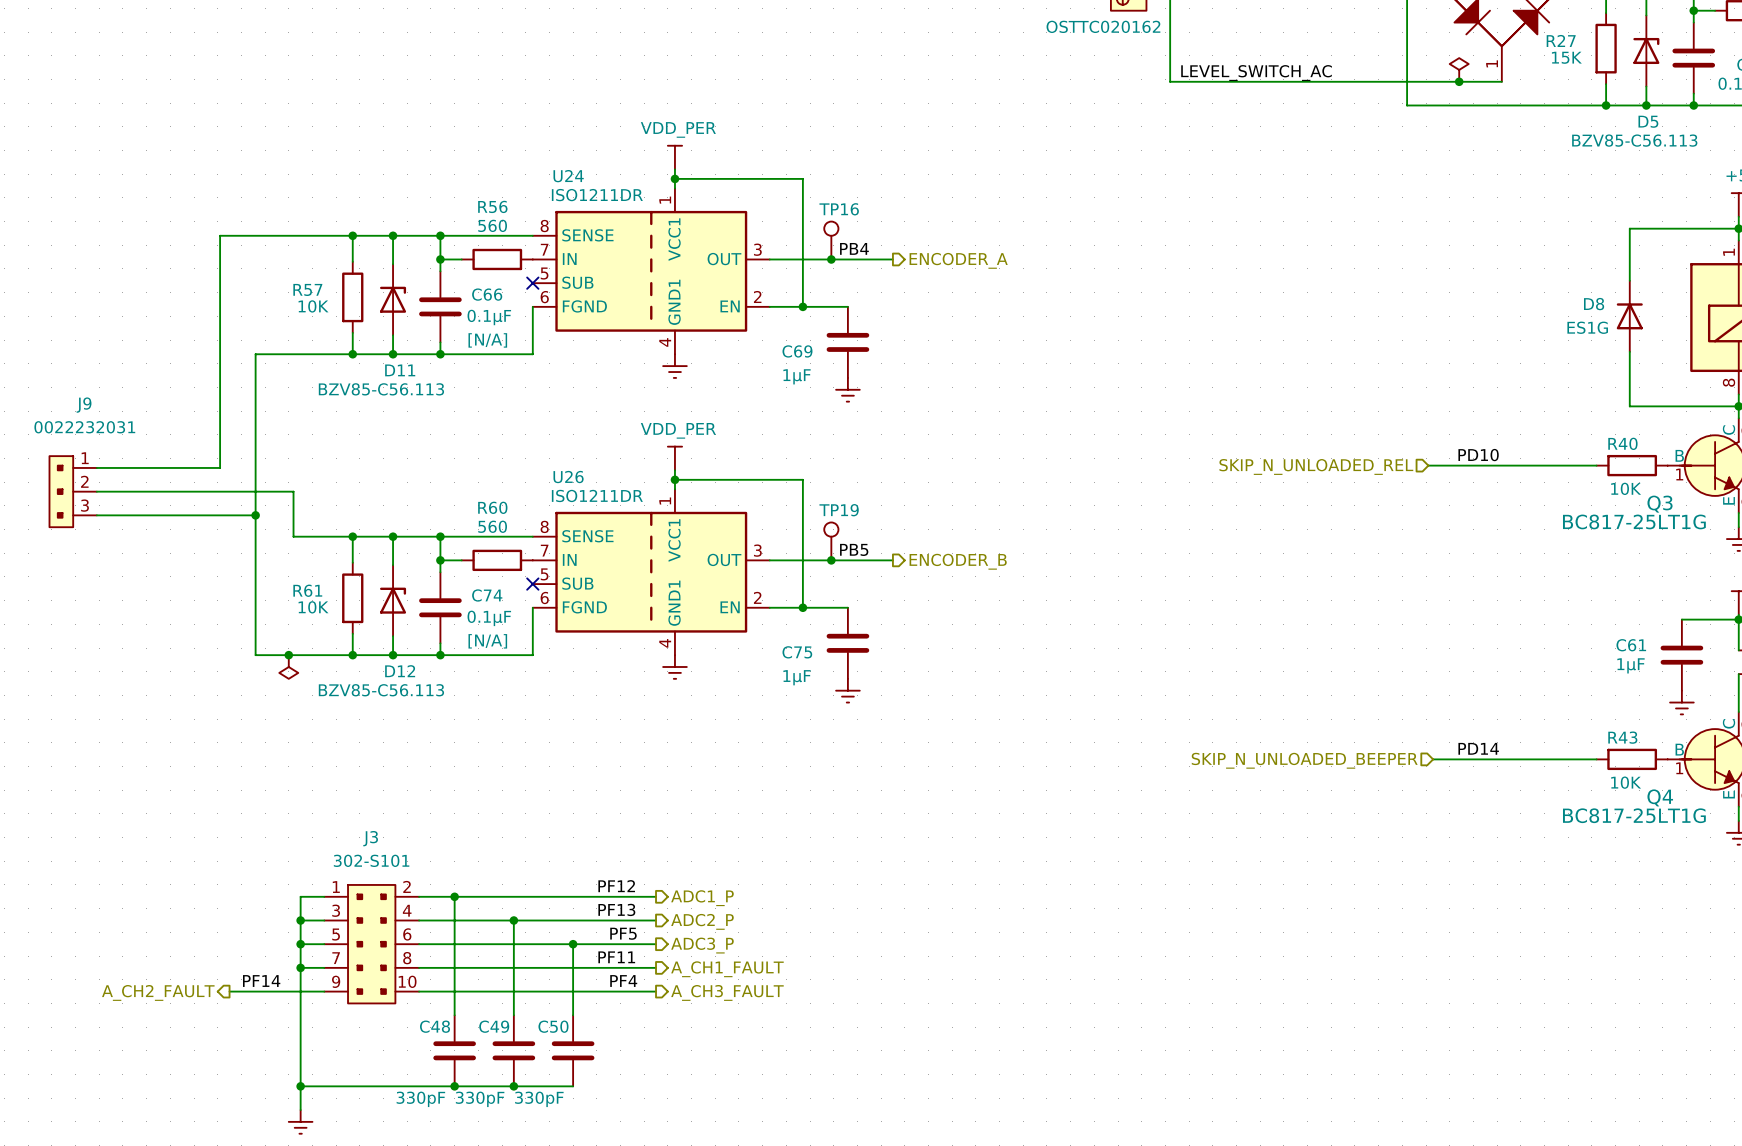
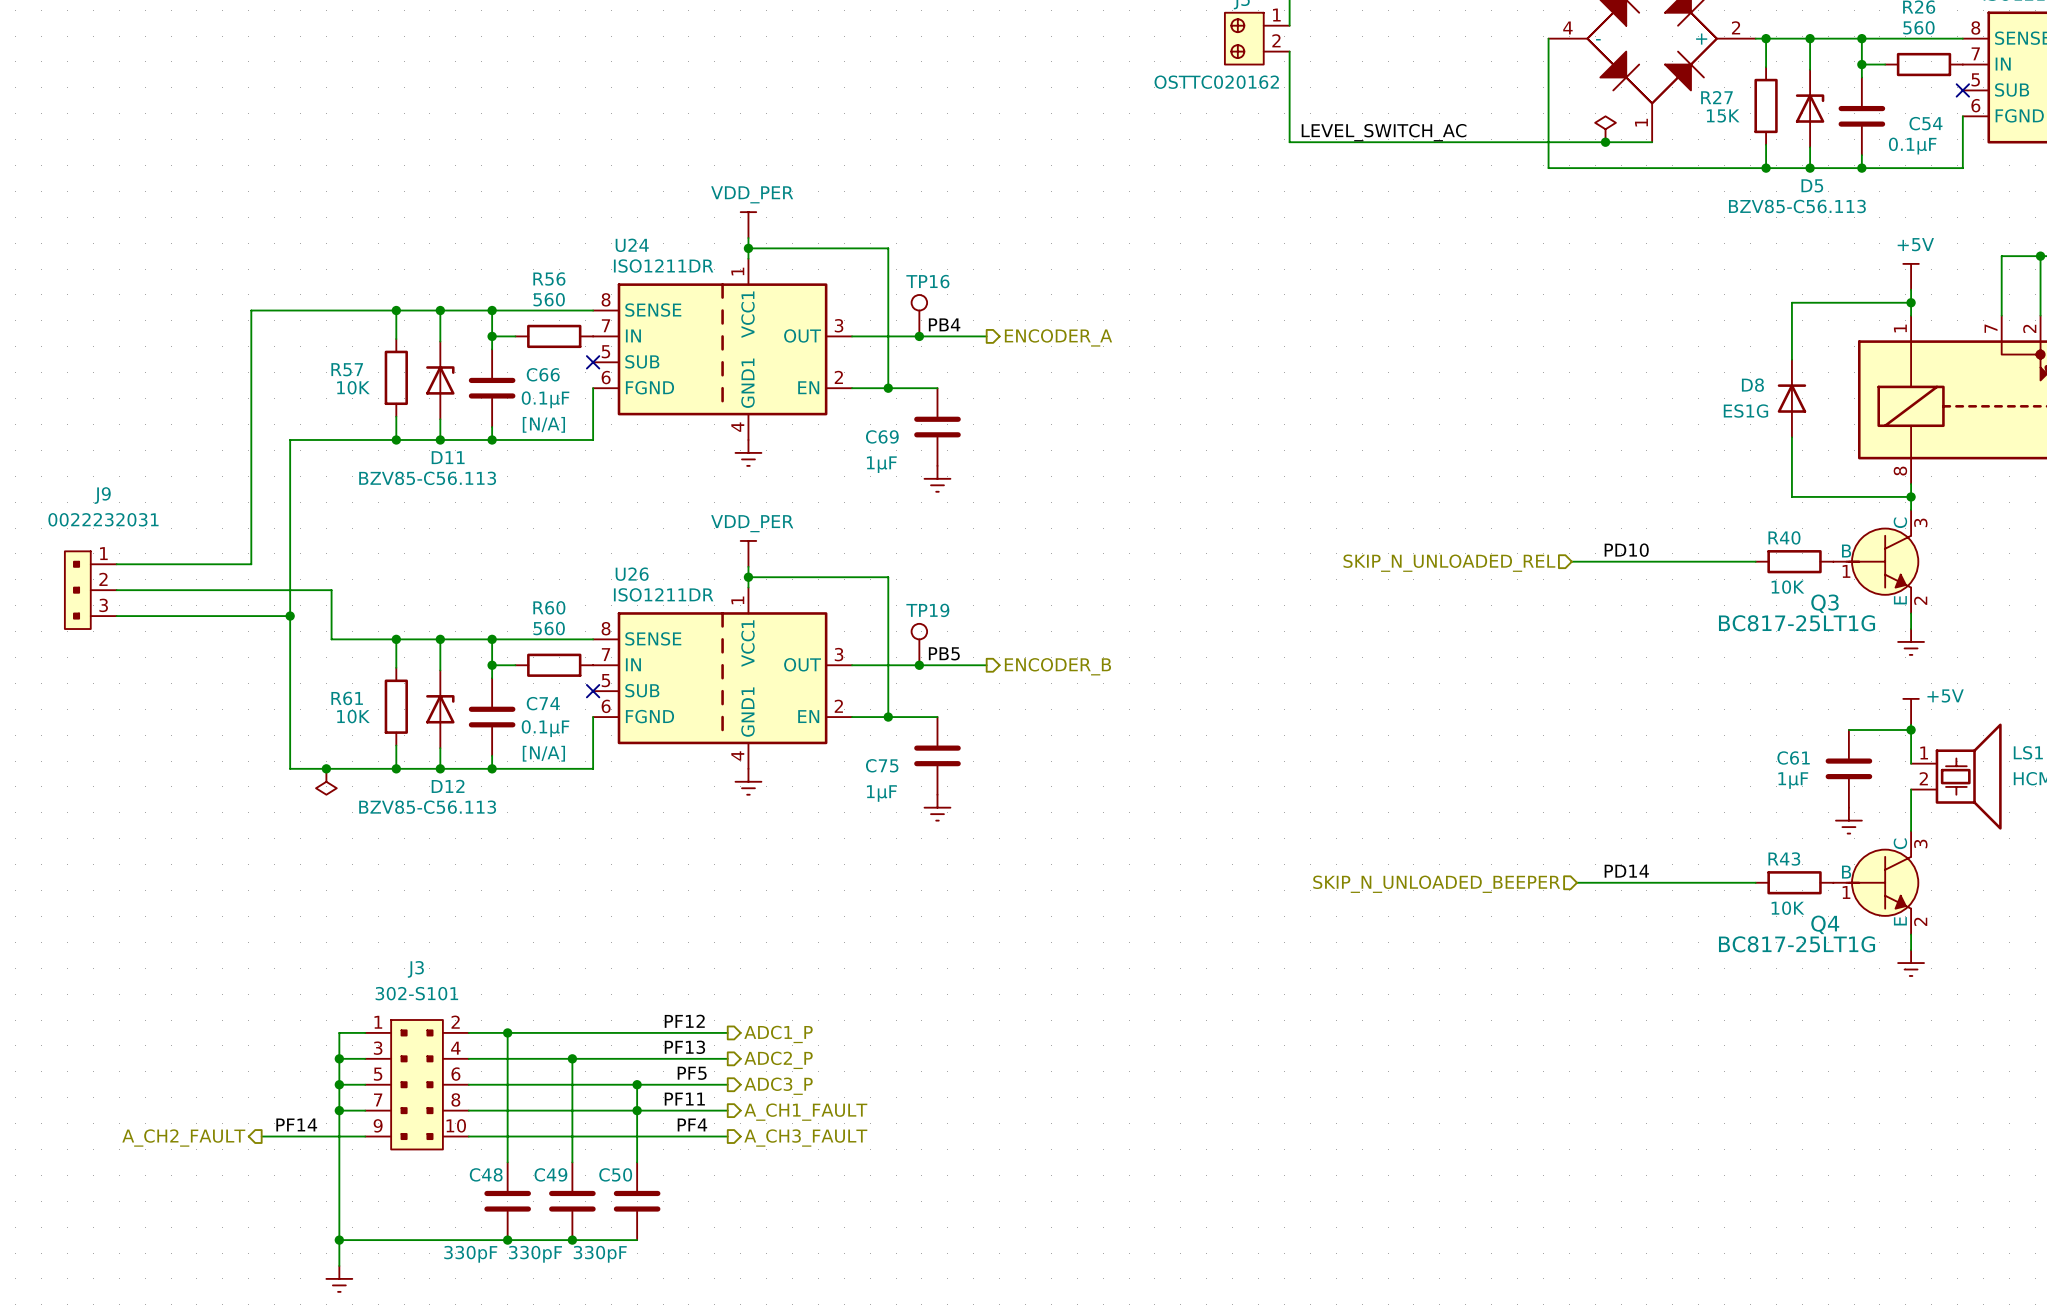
junction: none -> (637, 1110)

